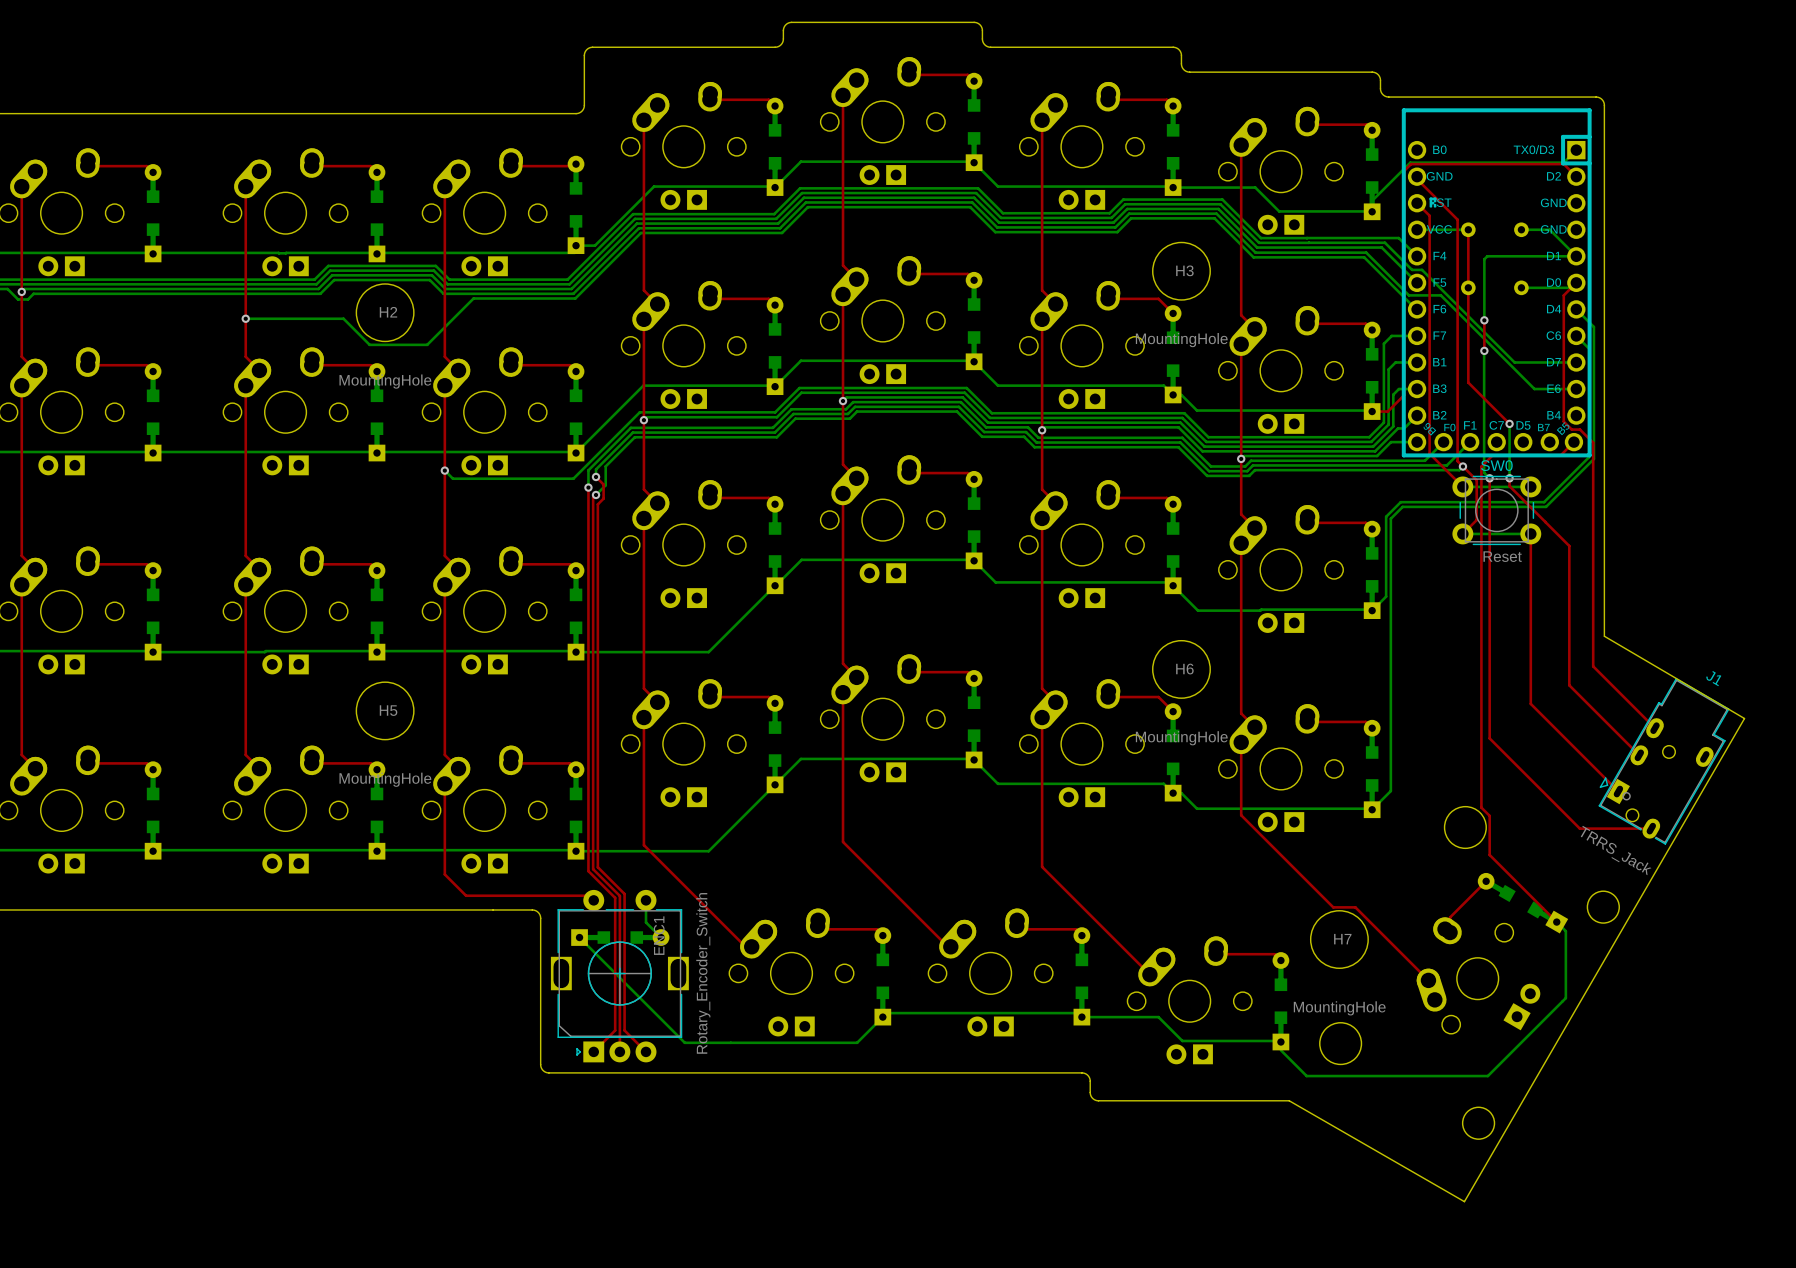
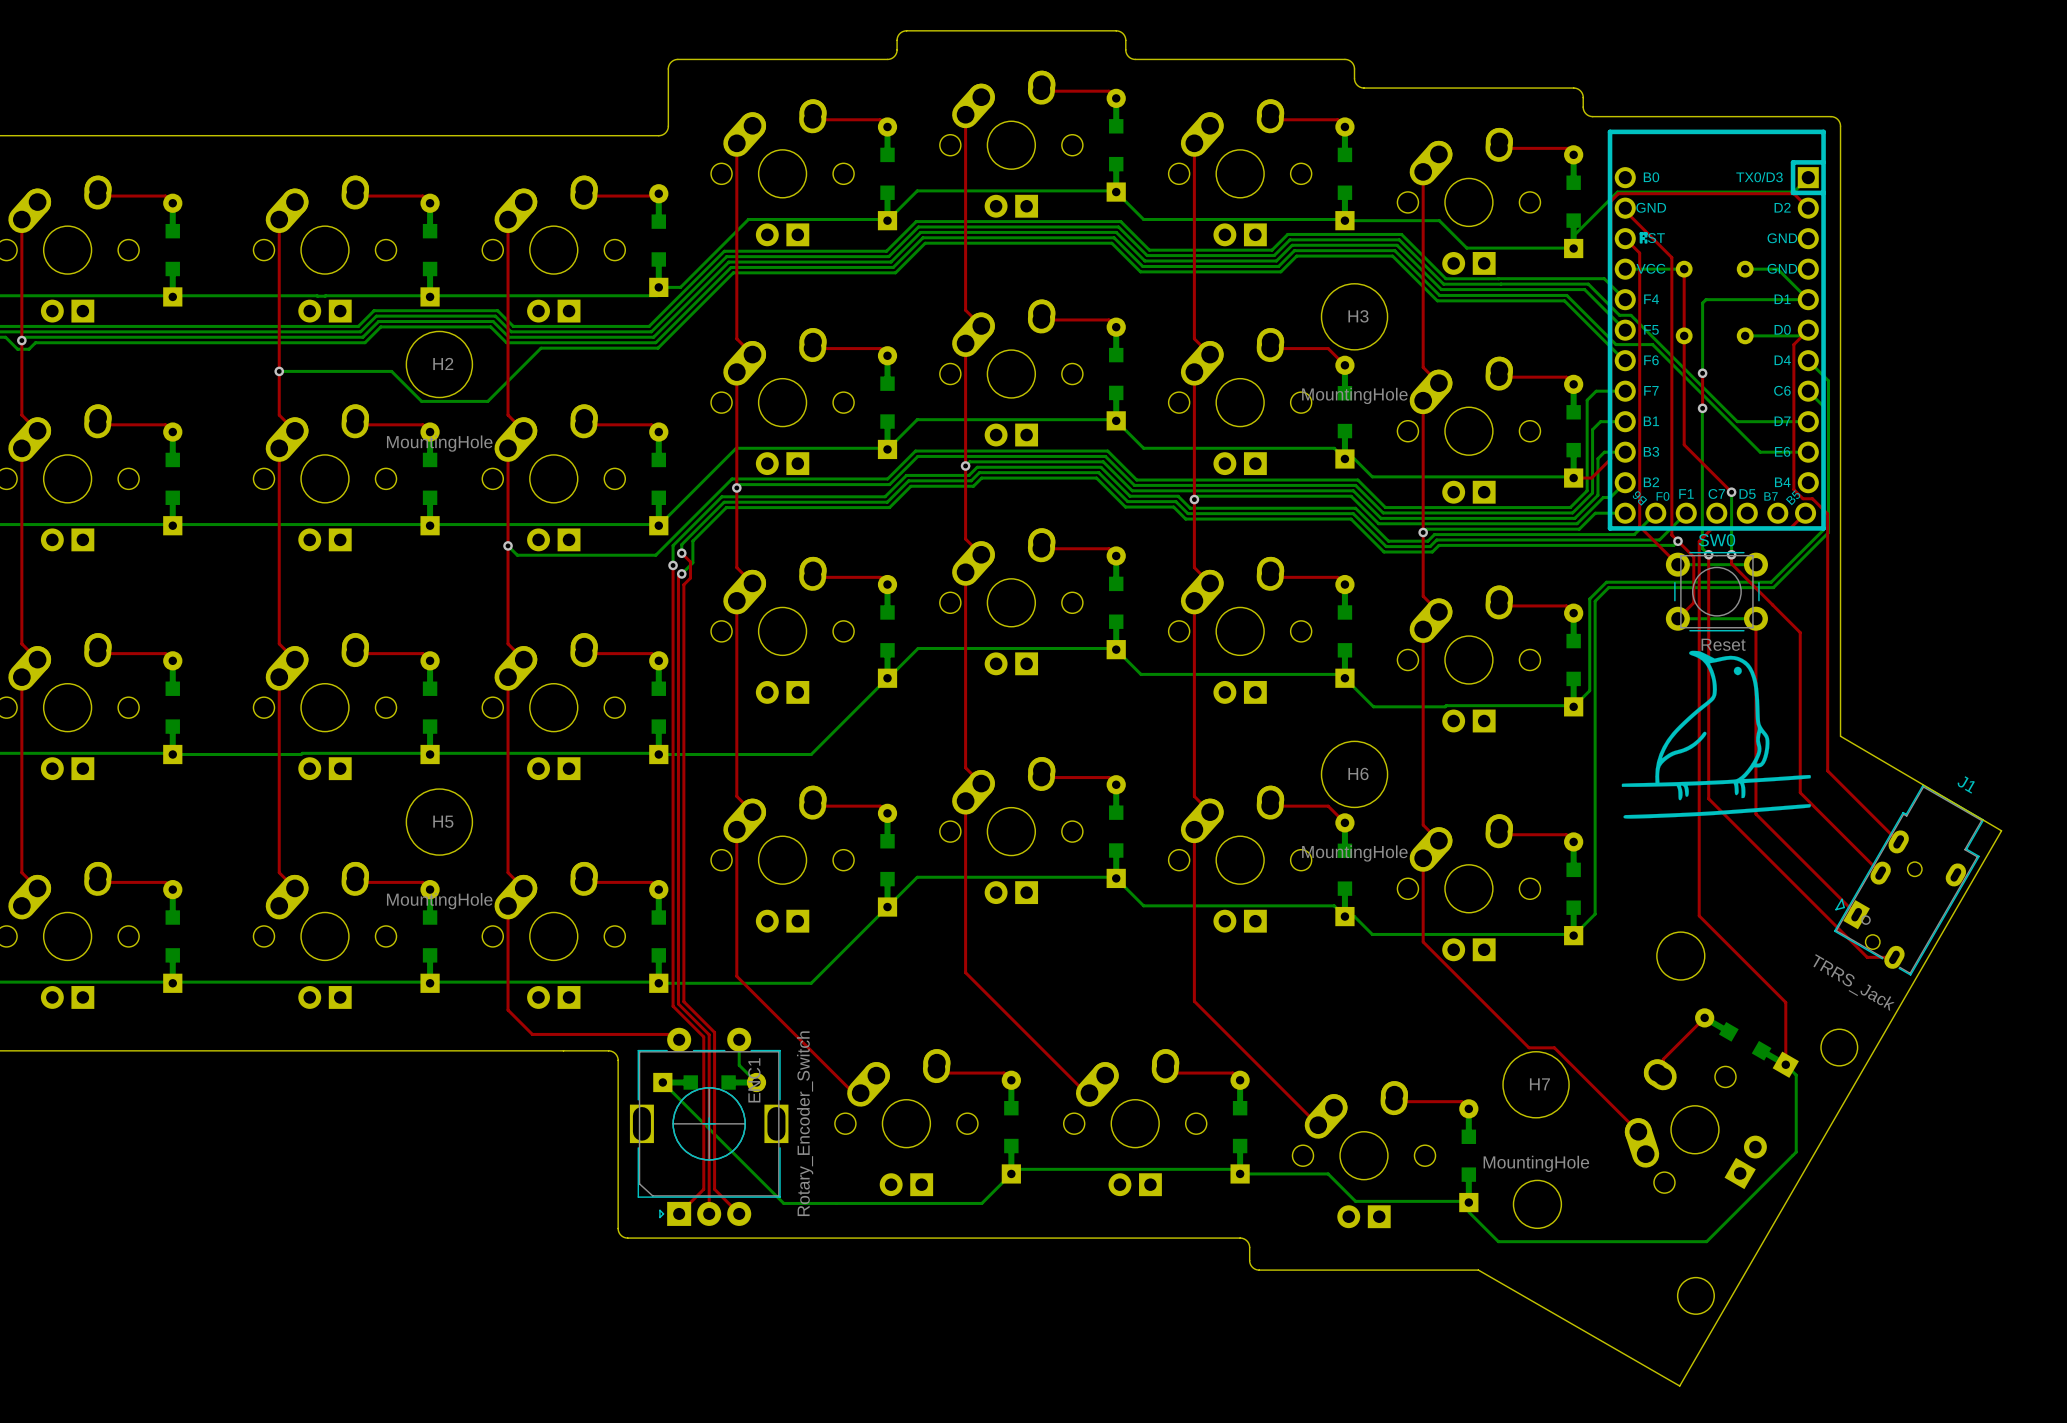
drawing: none -> [1621, 650, 1811, 819]
top track: (1489, 690) (1489, 738) (1579, 828) (1627, 828) -> (1708, 798) (1867, 957)
top track: (1481, 792) (1481, 807) (1489, 815) (1489, 855) (1556, 922) -> (1699, 915) (1785, 1002) (1785, 1064)

